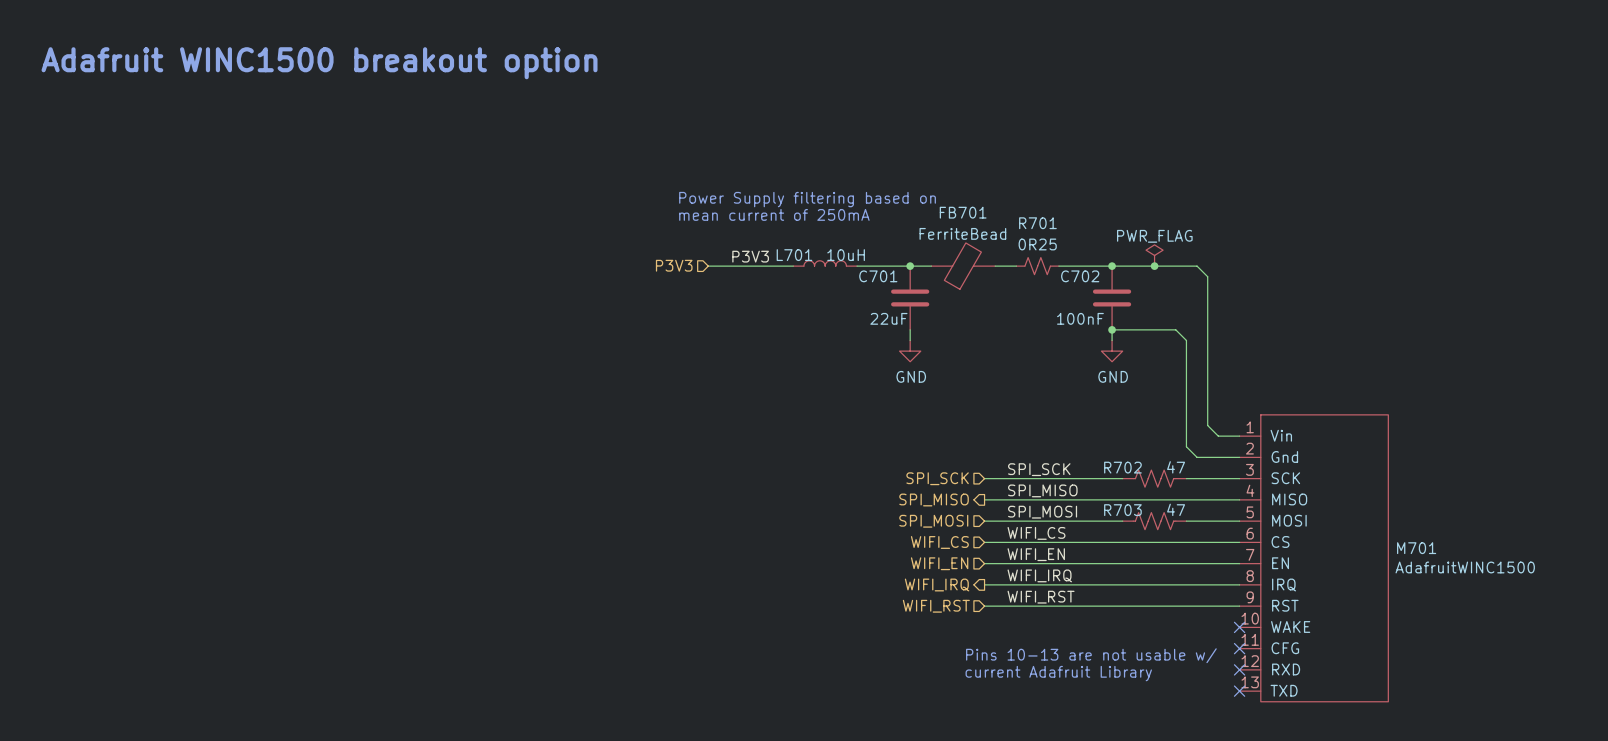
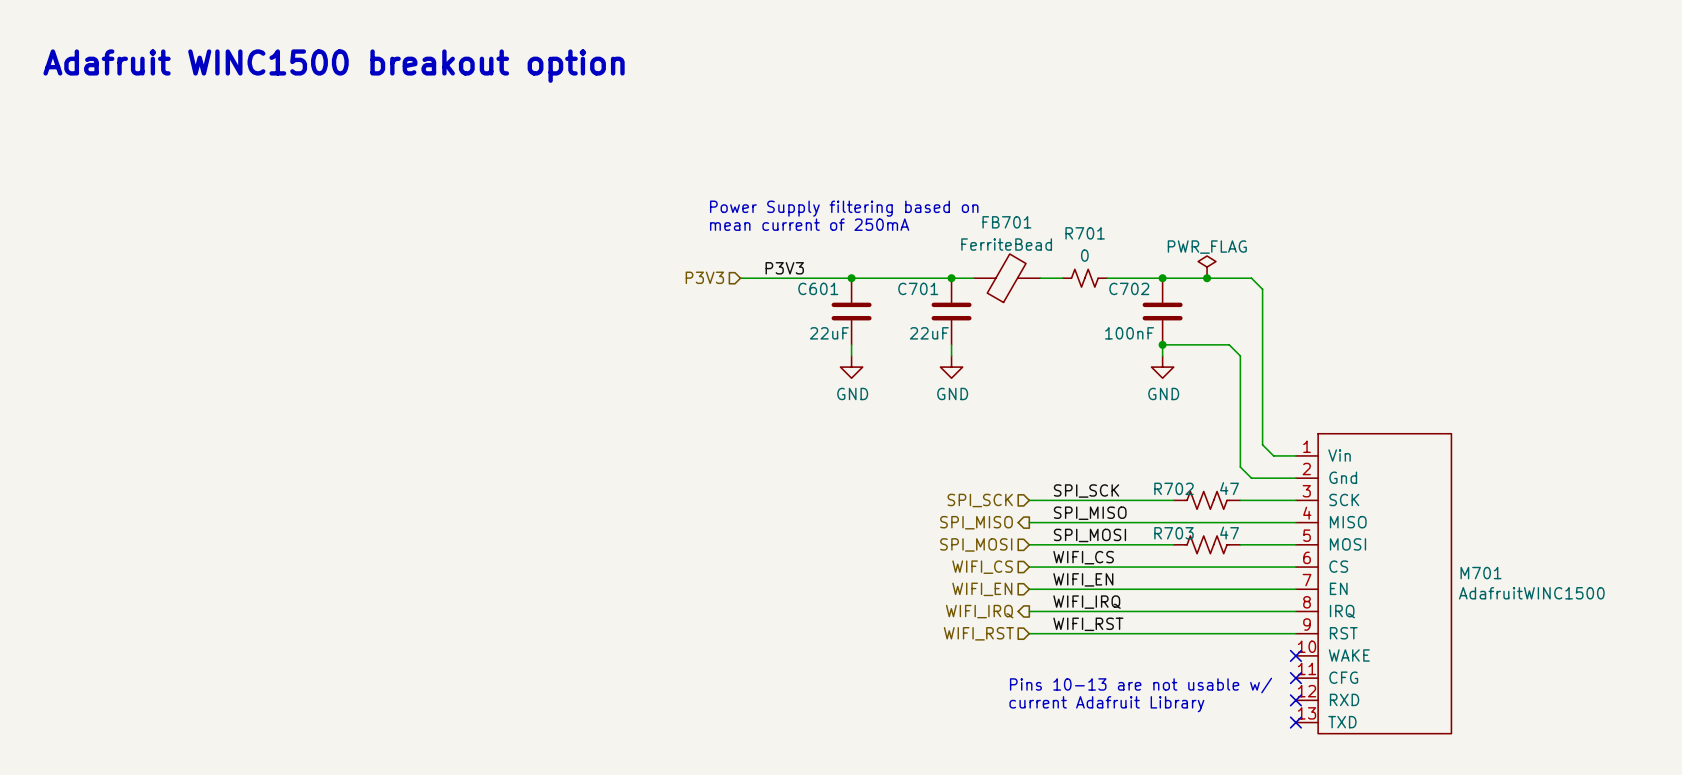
R701 value: 0R25 (1037, 244) -> 0 (1084, 255)
L701: 10uH (825, 263) -> none
wire: none -> (829, 278) (896, 278)
junction: none -> (851, 278)
C601: none -> 22uF (851, 311)
wire: none -> (851, 344) (851, 355)
power symbol: none -> GND (851, 367)

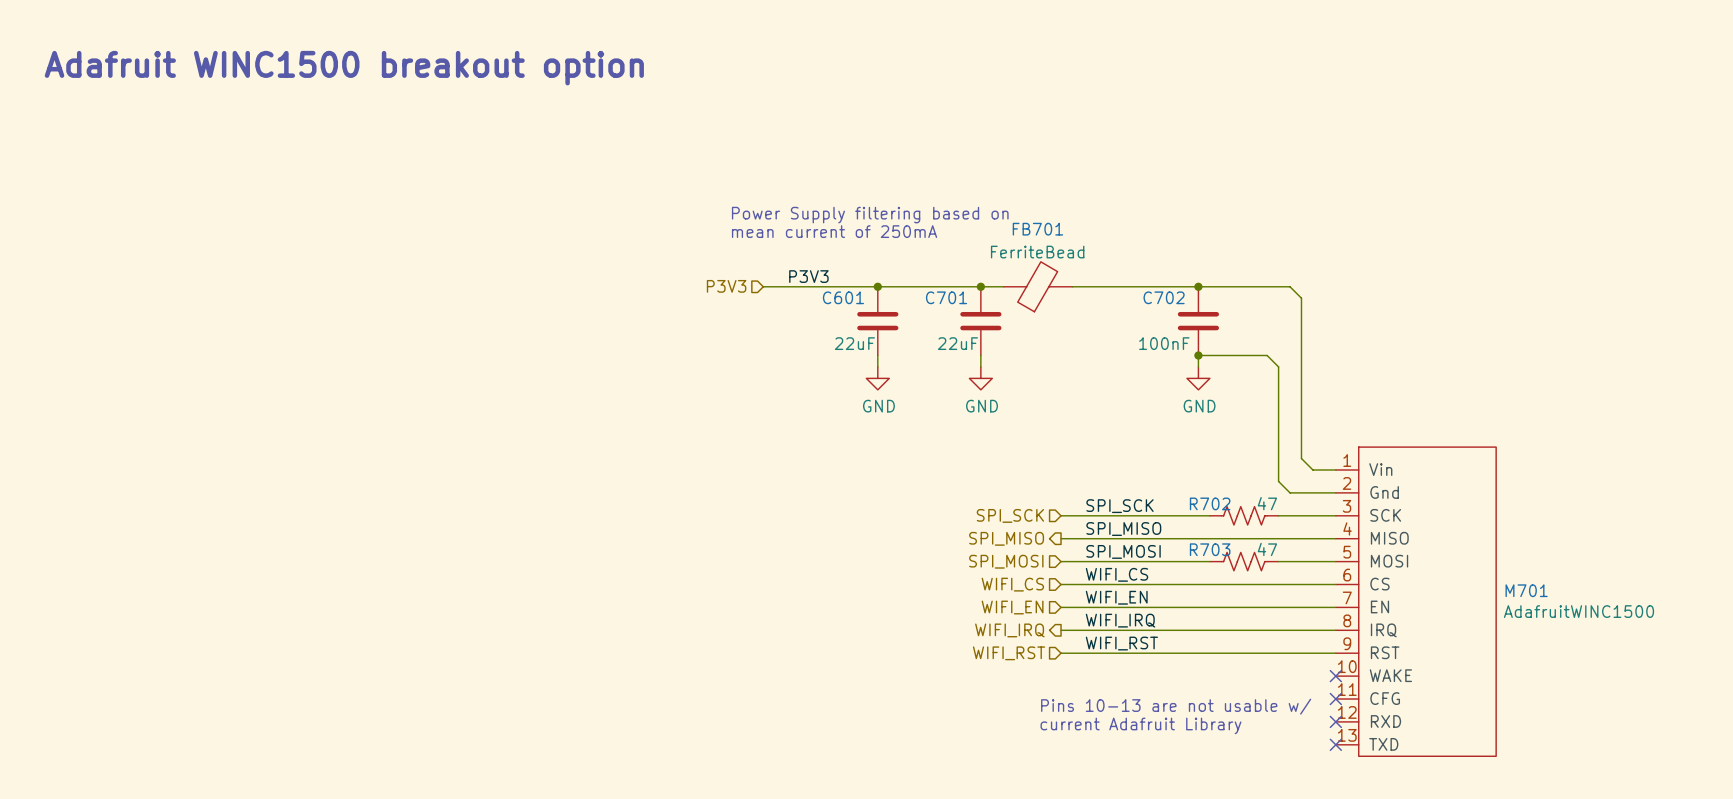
power symbol: PWR_FLAG (1207, 267) -> none
R701: 0 (1084, 278) -> none
junction: (1207, 278) -> none

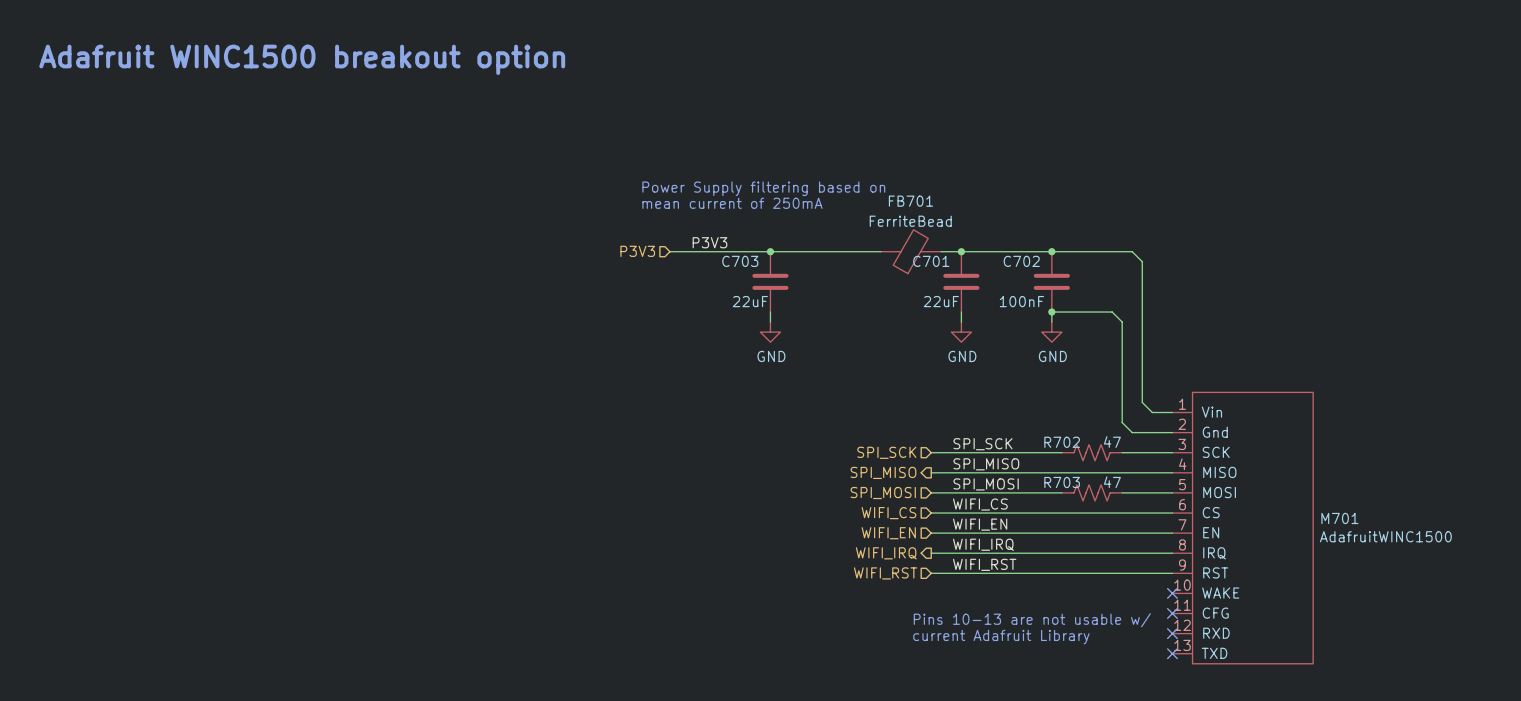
junction: (980, 286) -> none
junction: none -> (961, 251)
C601 name: C601 (843, 297) -> C703 (740, 261)
C701 position: (980, 321) -> (961, 281)
wire: (980, 355) (980, 366) -> (961, 312) (961, 322)
power symbol position: GND (980, 378) -> GND (961, 332)

